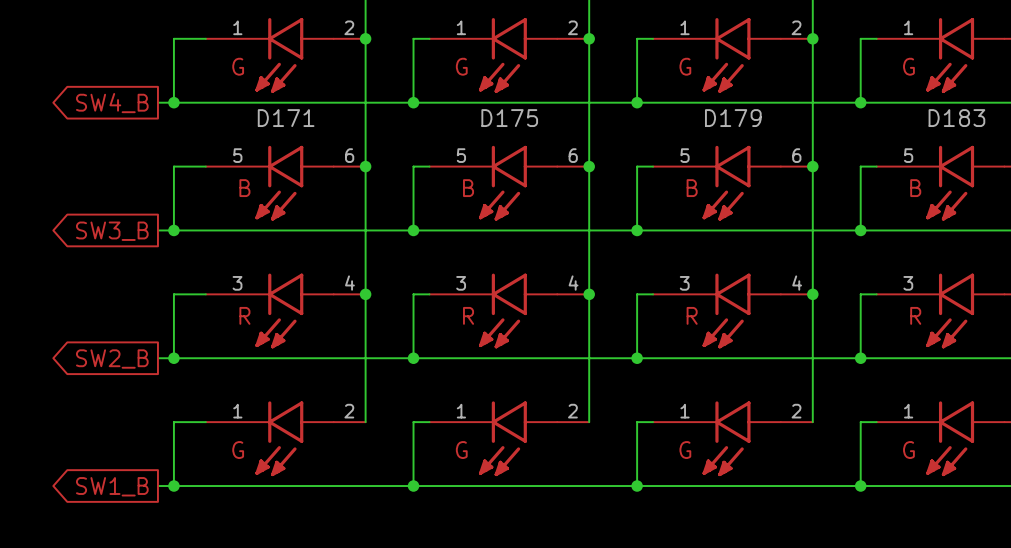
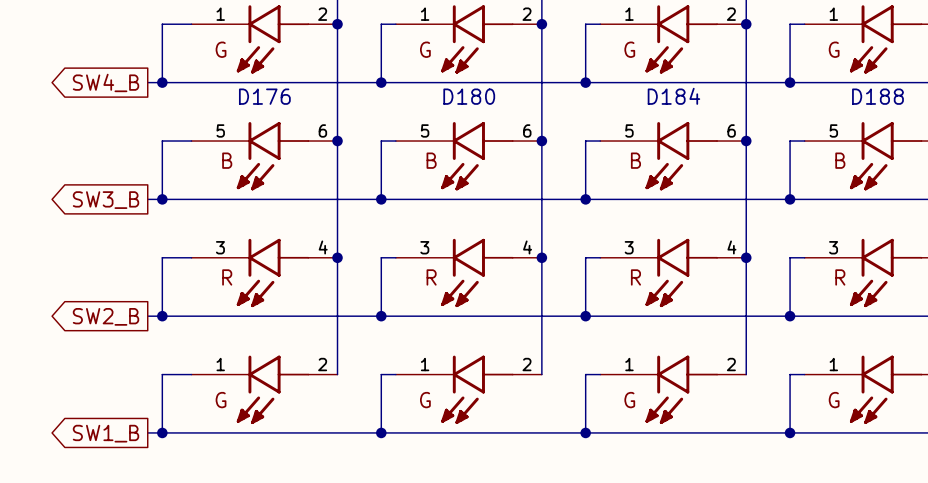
D171 name: D171 (286, 118) -> D176 (264, 96)
D175 name: D175 (509, 118) -> D180 (469, 96)
D179 name: D179 (733, 118) -> D184 (673, 96)
D183 name: D183 (956, 118) -> D188 (877, 96)

